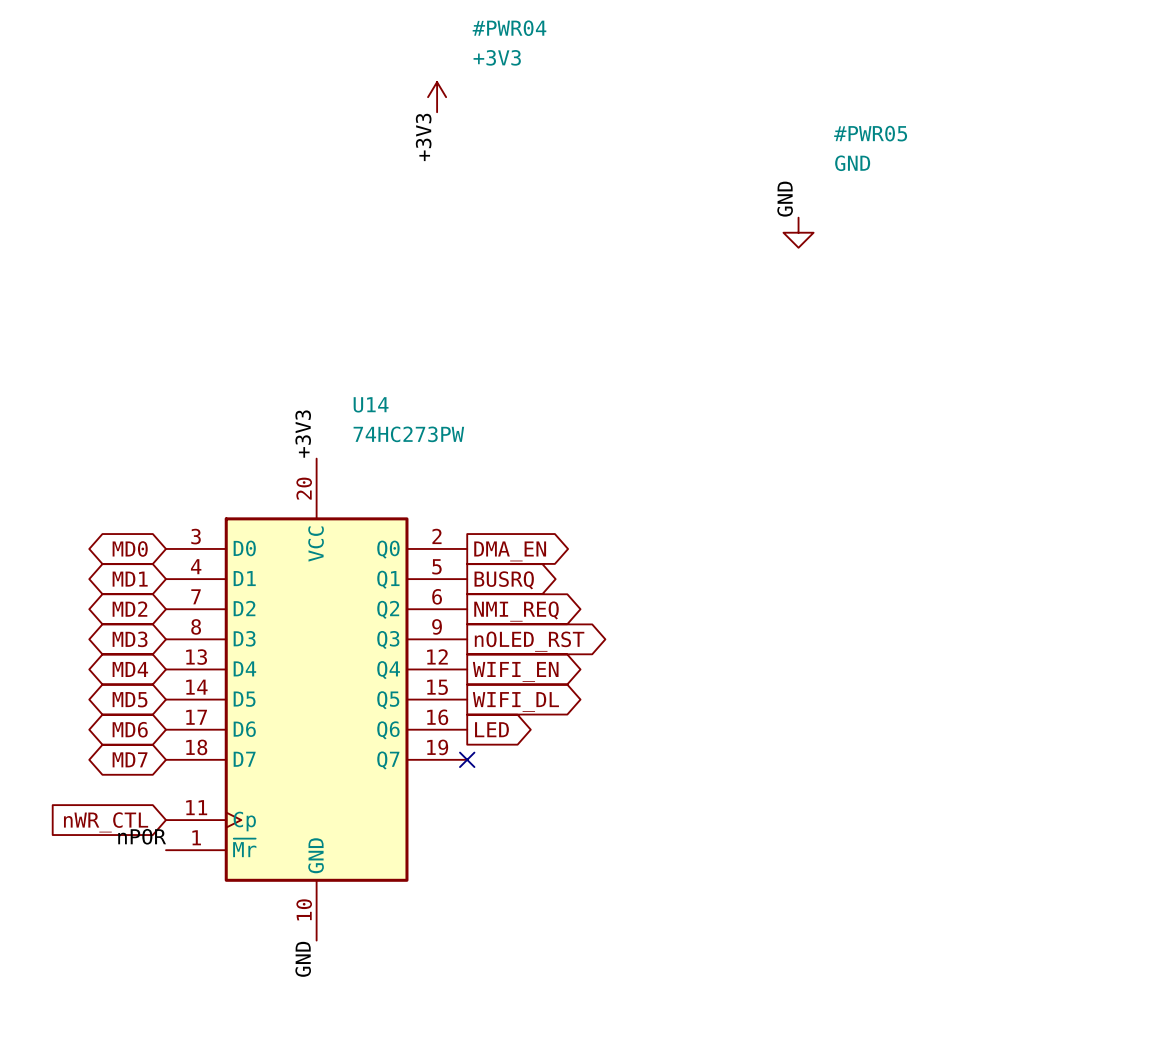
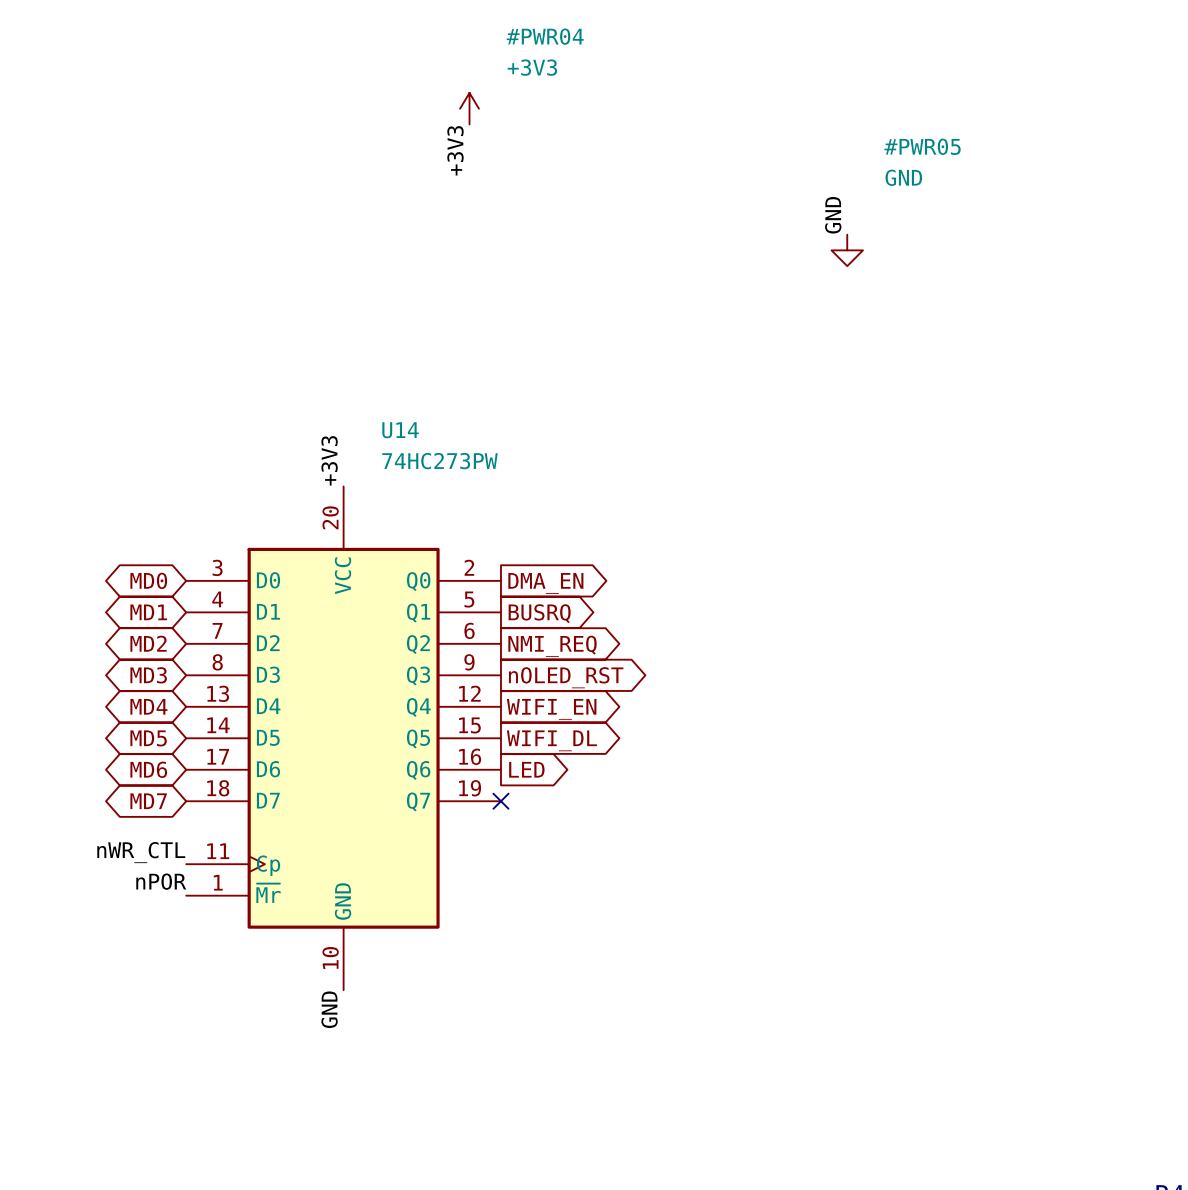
label: none -> nWR_CTL (141, 852)
global label: nWR_CTL (106, 822) -> none

